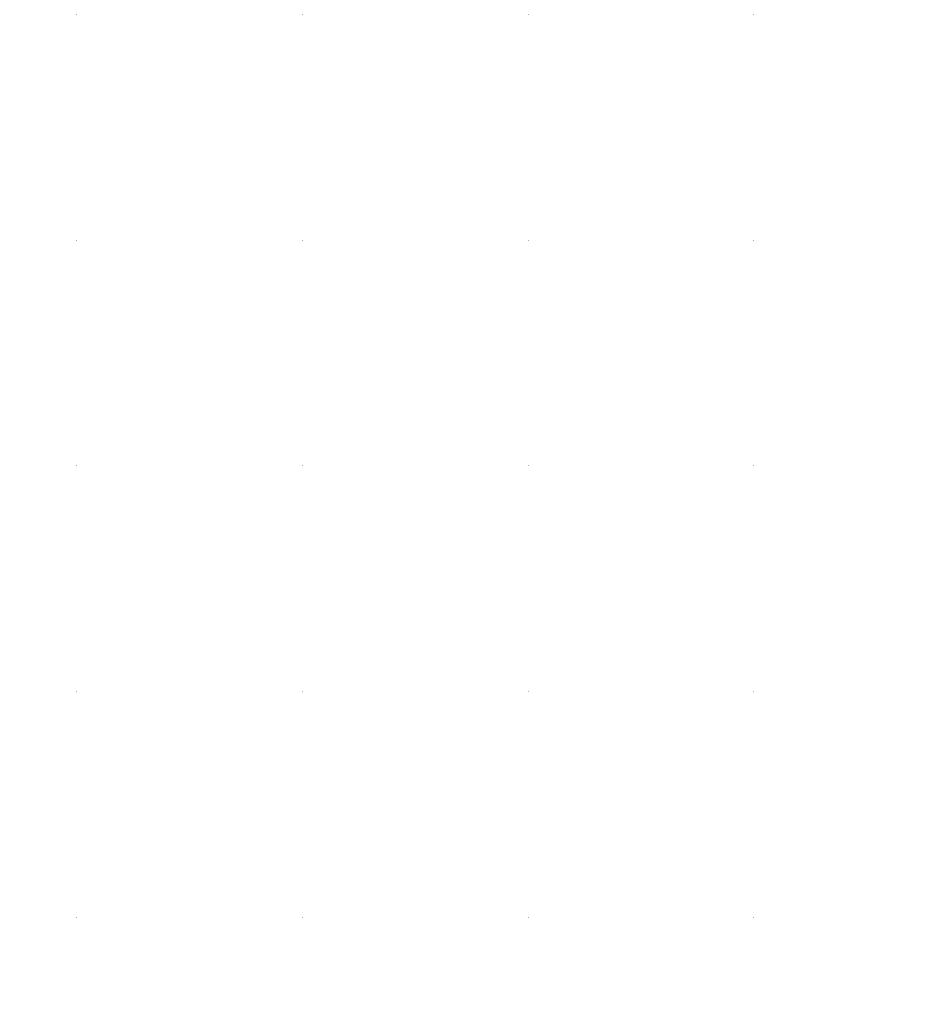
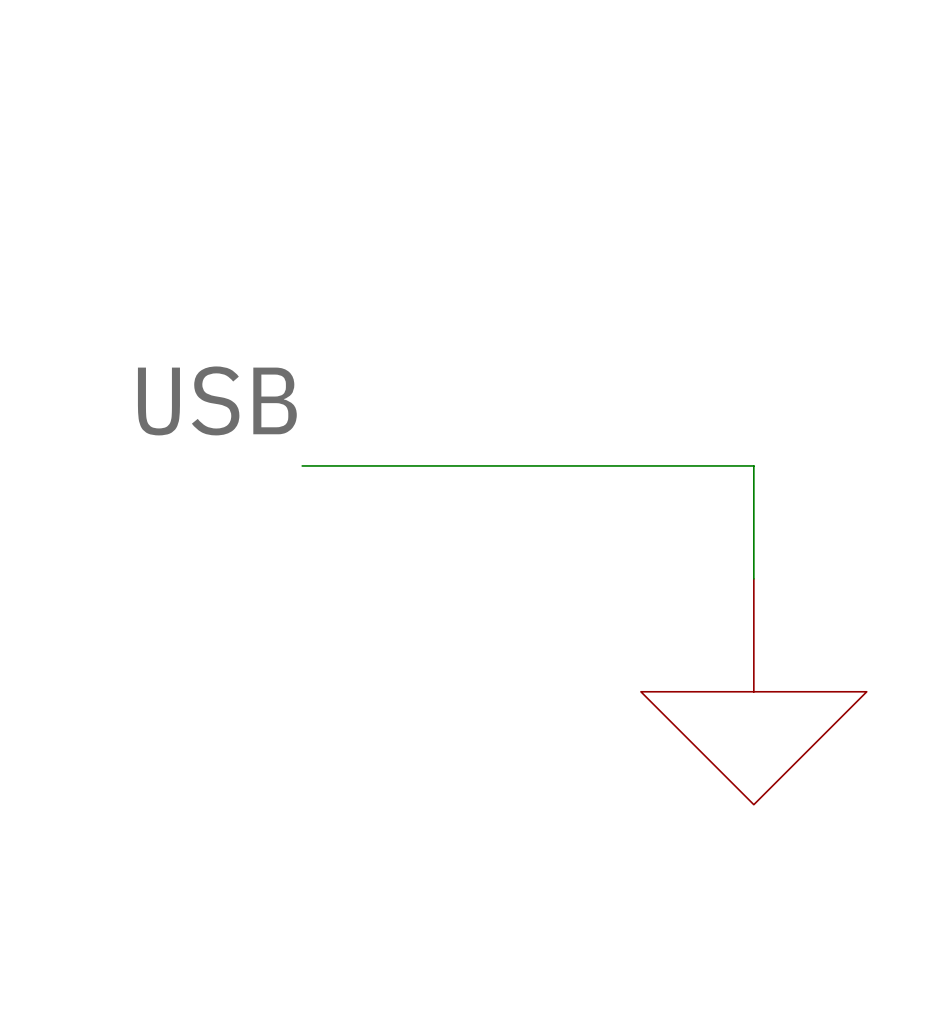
label: none -> USB (217, 400)
wire: none -> (302, 465) (753, 465) (753, 578)
power symbol: none -> (753, 691)

